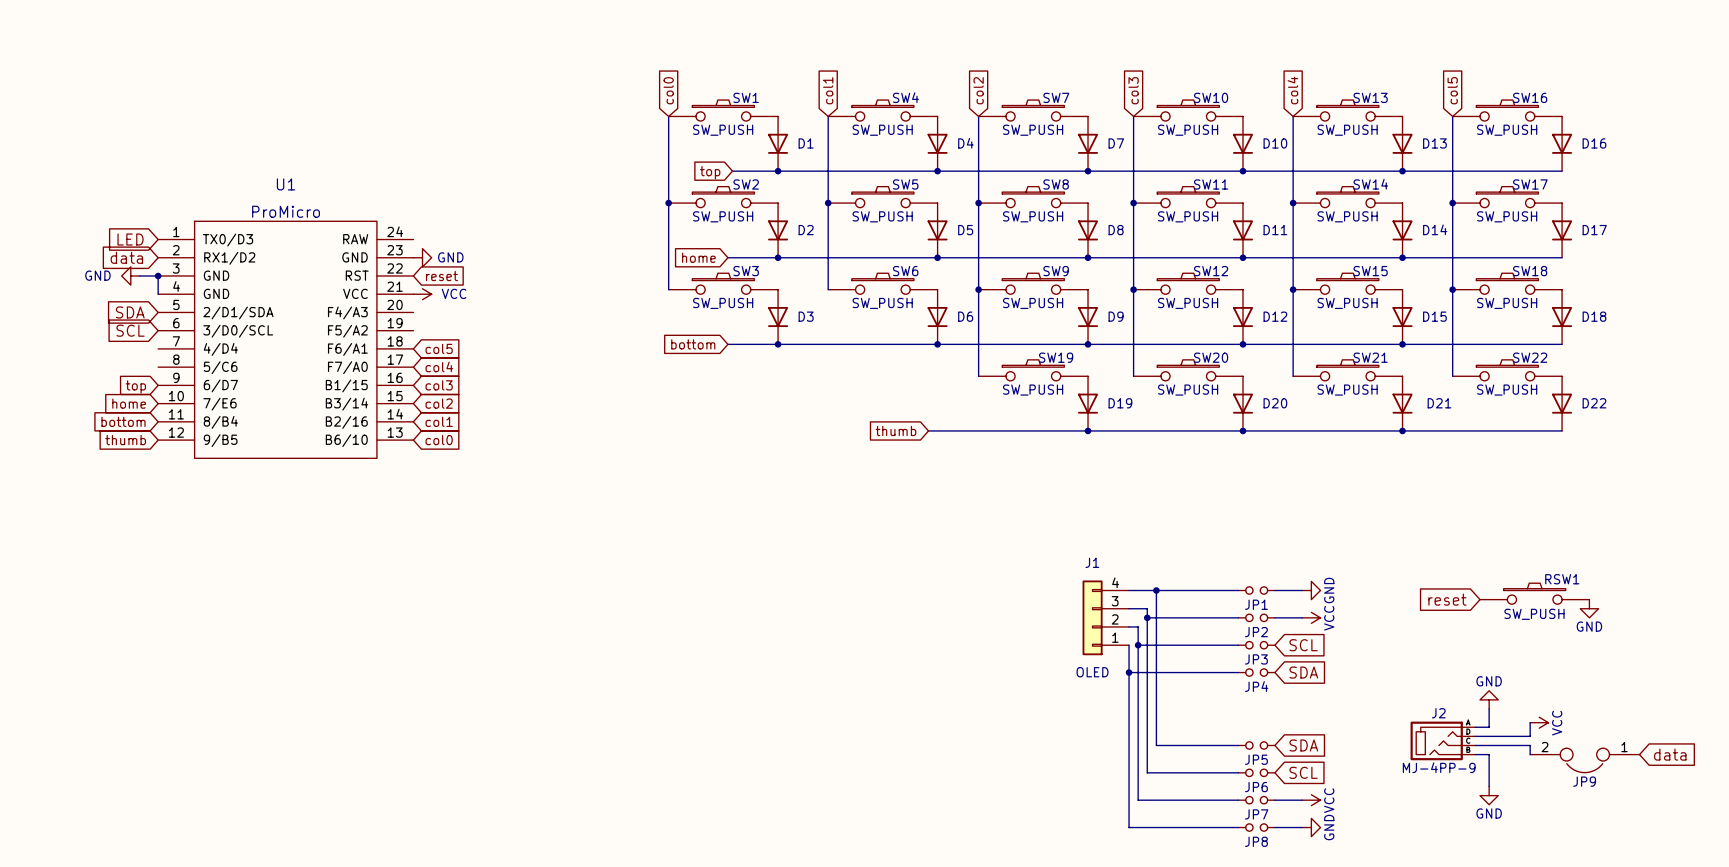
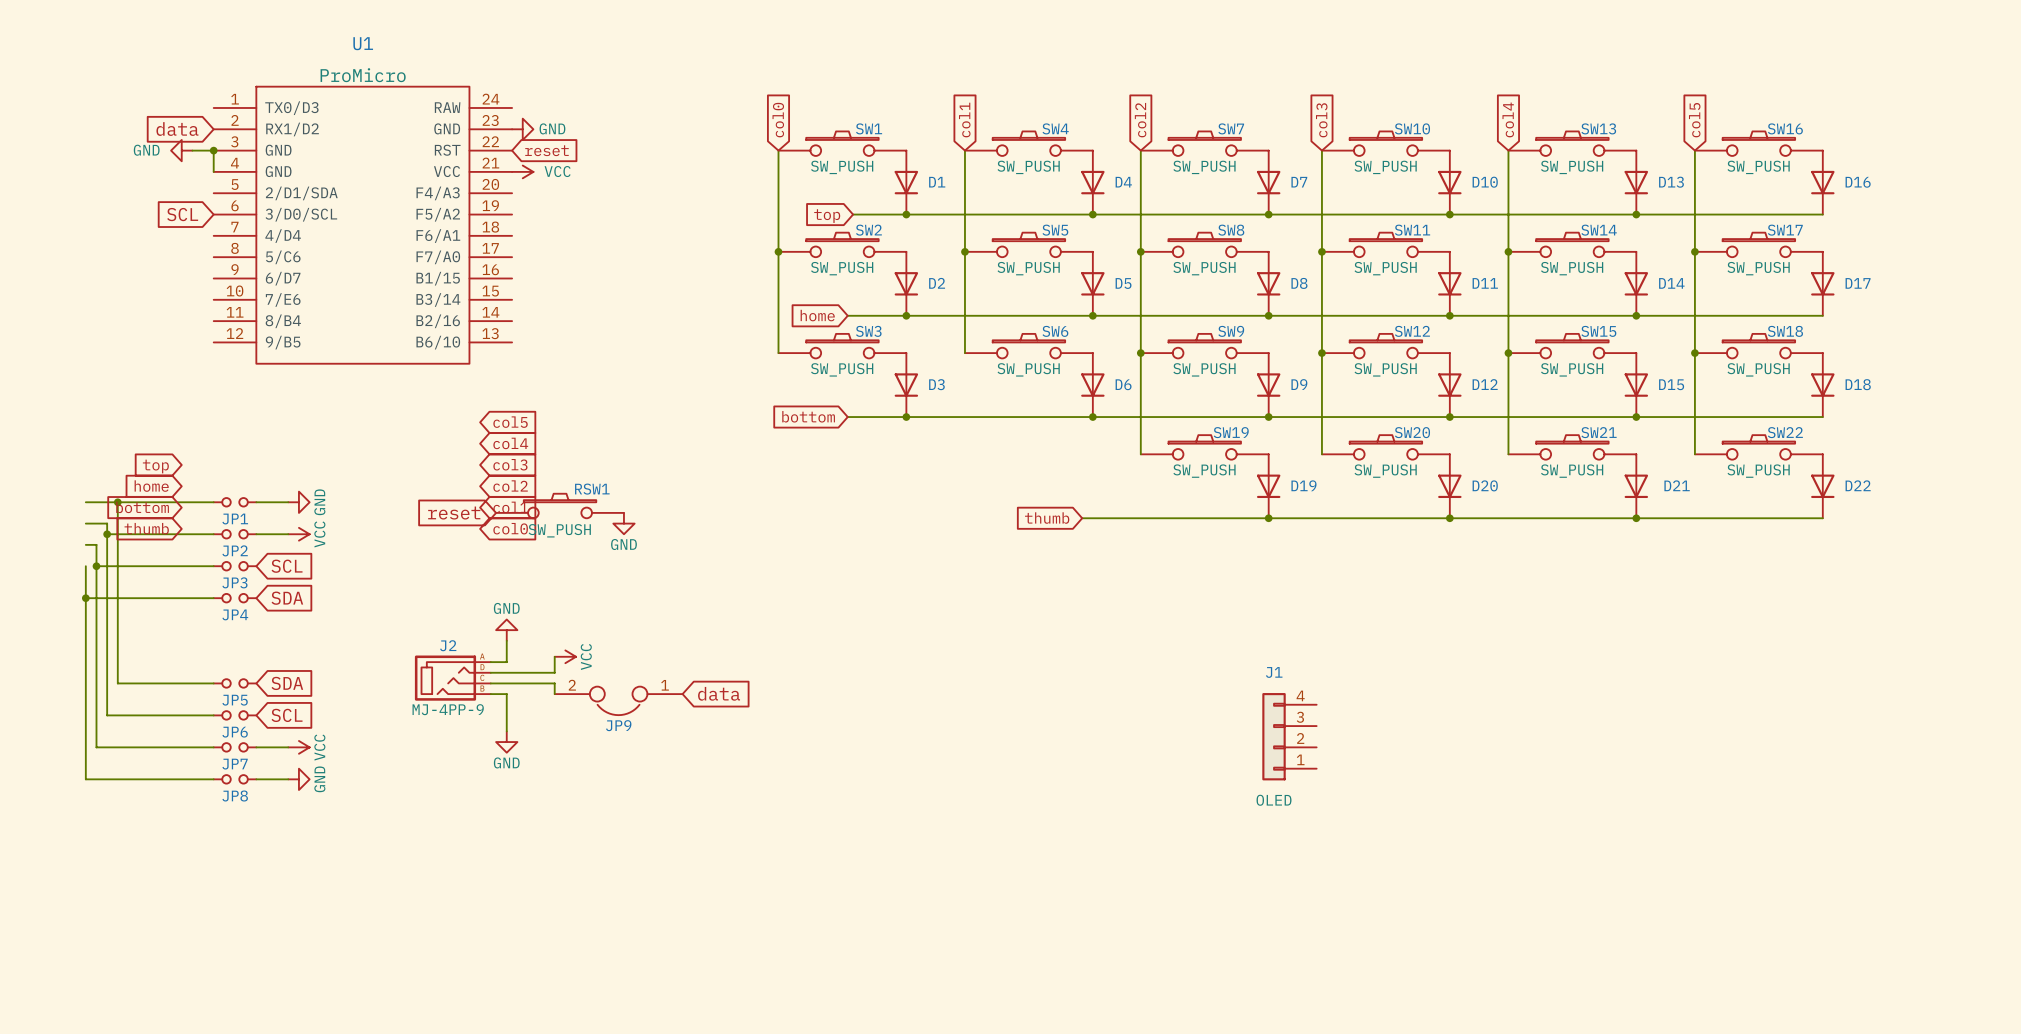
power symbol: none -> GND (522, 129)
power symbol: none -> GND (181, 150)
junction: none -> (213, 150)
global label: none -> reset (547, 150)
power symbol: none -> VCC (522, 171)
global label: none -> SCL (182, 214)
global label: LED (130, 239) -> none
global label position: data (126, 257) -> data (177, 129)
power symbol: GND (422, 257) -> none
power symbol: GND (130, 275) -> none
wire: (139, 275) (158, 275) (158, 294) -> (192, 150) (213, 150) (213, 171)
junction: (158, 275) -> none
global label: reset (441, 275) -> none
power symbol: VCC (422, 294) -> none
global label: SDA (130, 312) -> none
global label: SCL (130, 330) -> none
U1 position: (285, 339) -> (362, 225)
wire: none -> (85, 502) (213, 502)
wire: none -> (117, 502) (117, 683) (213, 683)
junction: none -> (117, 502)
wire: none -> (256, 502) (288, 502)
power symbol: none -> GND (298, 502)
global label: none -> reset (454, 513)
wire: none -> (85, 523) (107, 523) (107, 715) (213, 715)
power symbol: none -> GND (623, 523)
wire: none -> (107, 534) (213, 534)
junction: none -> (107, 534)
wire: none -> (256, 534) (288, 534)
power symbol: none -> VCC (298, 534)
wire: none -> (85, 544) (96, 544) (96, 747) (213, 747)
wire: none -> (85, 566) (85, 779) (213, 779)
wire: none -> (96, 566) (213, 566)
junction: none -> (96, 566)
global label: none -> SCL (287, 566)
wire: none -> (85, 598) (213, 598)
junction: none -> (85, 598)
global label: none -> SDA (287, 598)
power symbol: none -> GND (506, 630)
wire: none -> (506, 640) (506, 662) (490, 662)
wire: none -> (554, 656) (554, 672) (490, 672)
power symbol: none -> VCC (565, 656)
global label: none -> SDA (287, 683)
wire: none -> (490, 683) (554, 683) (554, 694)
wire: none -> (490, 694) (506, 694) (506, 731)
global label: none -> data (719, 693)
wire: (1129, 590) (1238, 590) -> none
wire: (1156, 590) (1156, 745) (1238, 745) -> none
junction: (1156, 590) -> none
JP1 position: (1256, 590) -> (235, 502)
wire: (1274, 590) (1302, 590) -> none
power symbol: GND (1311, 590) -> none
RSW1 position: (1534, 593) -> (560, 506)
global label: none -> SCL (287, 715)
global label: reset (1447, 599) -> none
wire: (1129, 608) (1147, 608) (1147, 772) (1238, 772) -> none
power symbol: GND (1589, 608) -> none
wire: (1147, 617) (1238, 617) -> none
junction: (1147, 617) -> none
JP2 position: (1256, 617) -> (235, 534)
wire: (1274, 617) (1302, 617) -> none
power symbol: VCC (1311, 617) -> none
power symbol: none -> GND (506, 742)
wire: none -> (256, 747) (288, 747)
power symbol: none -> VCC (298, 747)
wire: (1129, 626) (1138, 626) (1138, 800) (1238, 800) -> none
wire: (1129, 645) (1129, 827) (1238, 827) -> none
wire: (1138, 645) (1238, 645) -> none
junction: (1138, 645) -> none
JP3 position: (1256, 645) -> (235, 566)
global label: SCL (1303, 645) -> none
wire: none -> (256, 779) (288, 779)
power symbol: none -> GND (298, 779)
wire: (1129, 672) (1238, 672) -> none
junction: (1129, 672) -> none
JP4 position: (1256, 672) -> (235, 598)
global label: SDA (1303, 672) -> none
power symbol: GND (1489, 699) -> none
wire: (1489, 709) (1489, 727) (1475, 727) -> none
wire: (1530, 722) (1530, 736) (1475, 736) -> none
power symbol: VCC (1539, 722) -> none
J2 position: (1443, 740) -> (452, 678)
JP5 position: (1256, 745) -> (235, 683)
global label: SDA (1303, 745) -> none
wire: (1475, 745) (1530, 745) (1530, 754) -> none
wire: (1475, 754) (1489, 754) (1489, 786) -> none
global label: data (1670, 754) -> none
JP9 position: (1584, 760) -> (618, 700)
JP6 position: (1256, 772) -> (235, 715)
global label: SCL (1303, 772) -> none
power symbol: GND (1489, 795) -> none
JP7 position: (1256, 800) -> (235, 747)
wire: (1274, 800) (1302, 800) -> none
power symbol: VCC (1311, 800) -> none
JP8 position: (1256, 827) -> (235, 779)
wire: (1274, 827) (1302, 827) -> none
power symbol: GND (1311, 827) -> none

